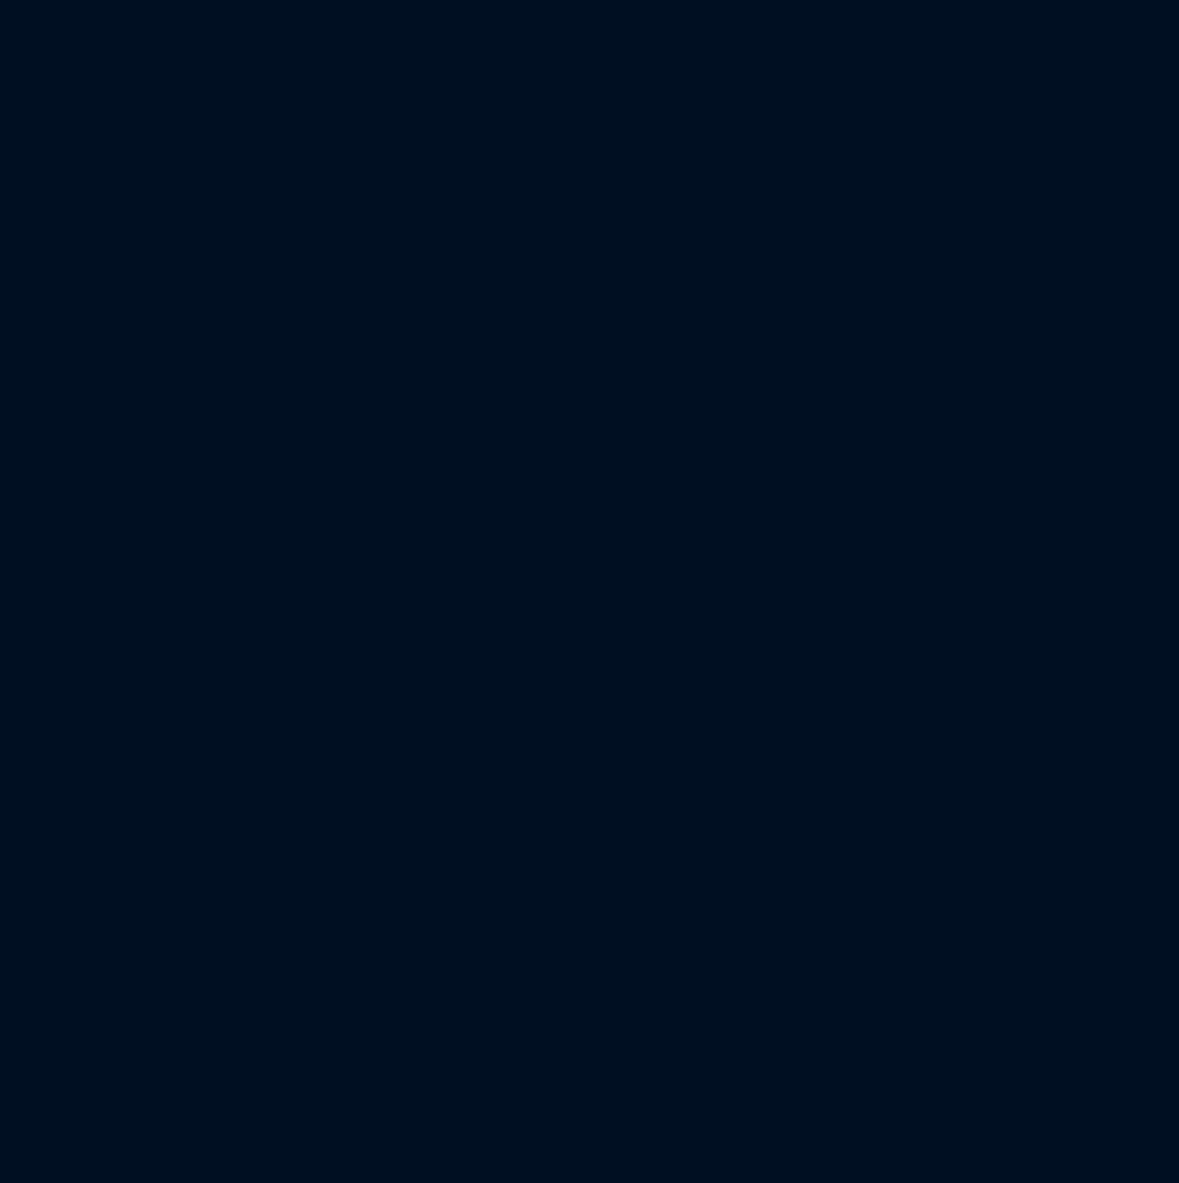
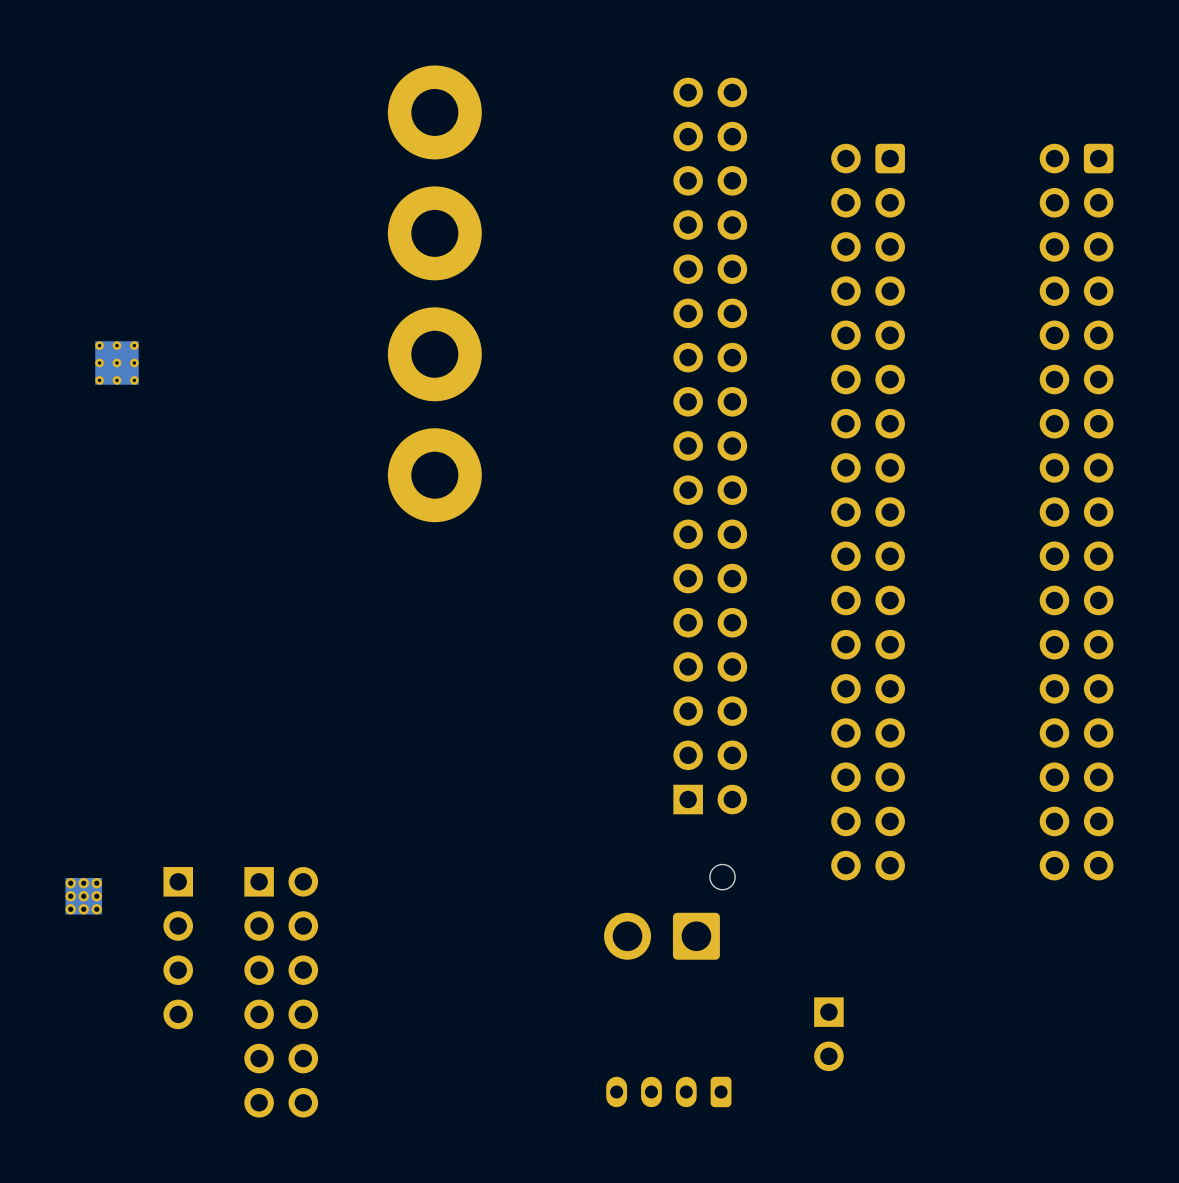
part: none -> (434, 112)
part: none -> (434, 233)
part: none -> (434, 354)
part: none -> (116, 362)
part: none -> (710, 445)
part: none -> (434, 475)
part: none -> (868, 512)
part: none -> (1076, 512)
part: none -> (83, 896)
part: none -> (669, 912)
part: none -> (178, 948)
part: none -> (281, 992)
part: none -> (828, 1034)
part: none -> (668, 1091)

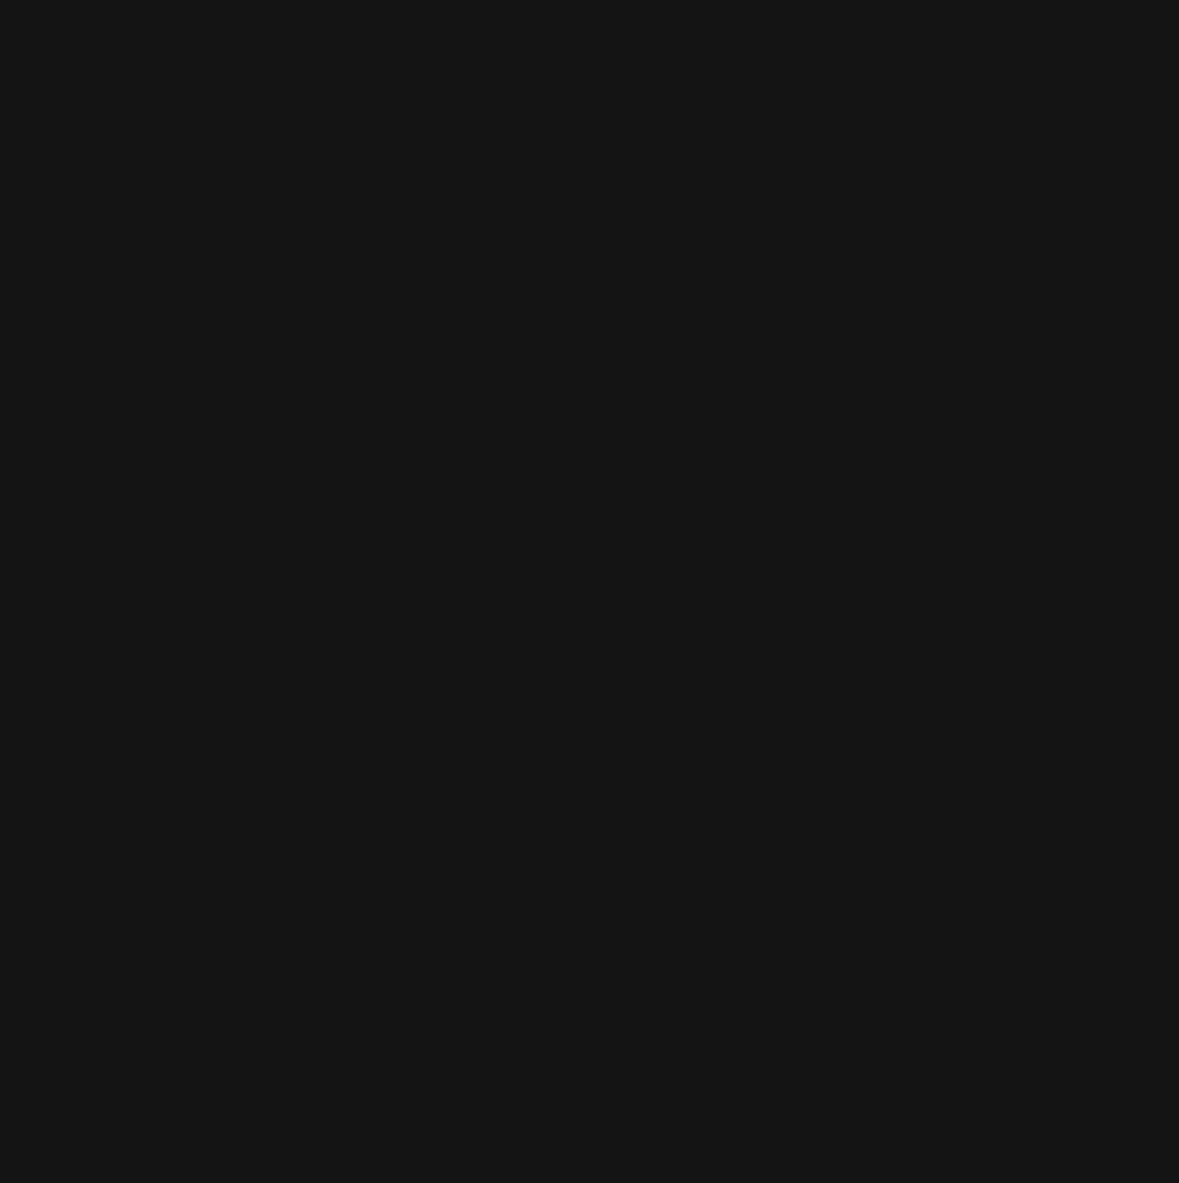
part: (434, 112) -> none
part: (434, 233) -> none
part: (434, 354) -> none
part: (116, 362) -> none
part: (710, 445) -> none
part: (434, 475) -> none
part: (868, 512) -> none
part: (1076, 512) -> none
part: (83, 896) -> none
part: (669, 912) -> none
part: (178, 948) -> none
part: (281, 992) -> none
part: (828, 1034) -> none
part: (668, 1091) -> none

